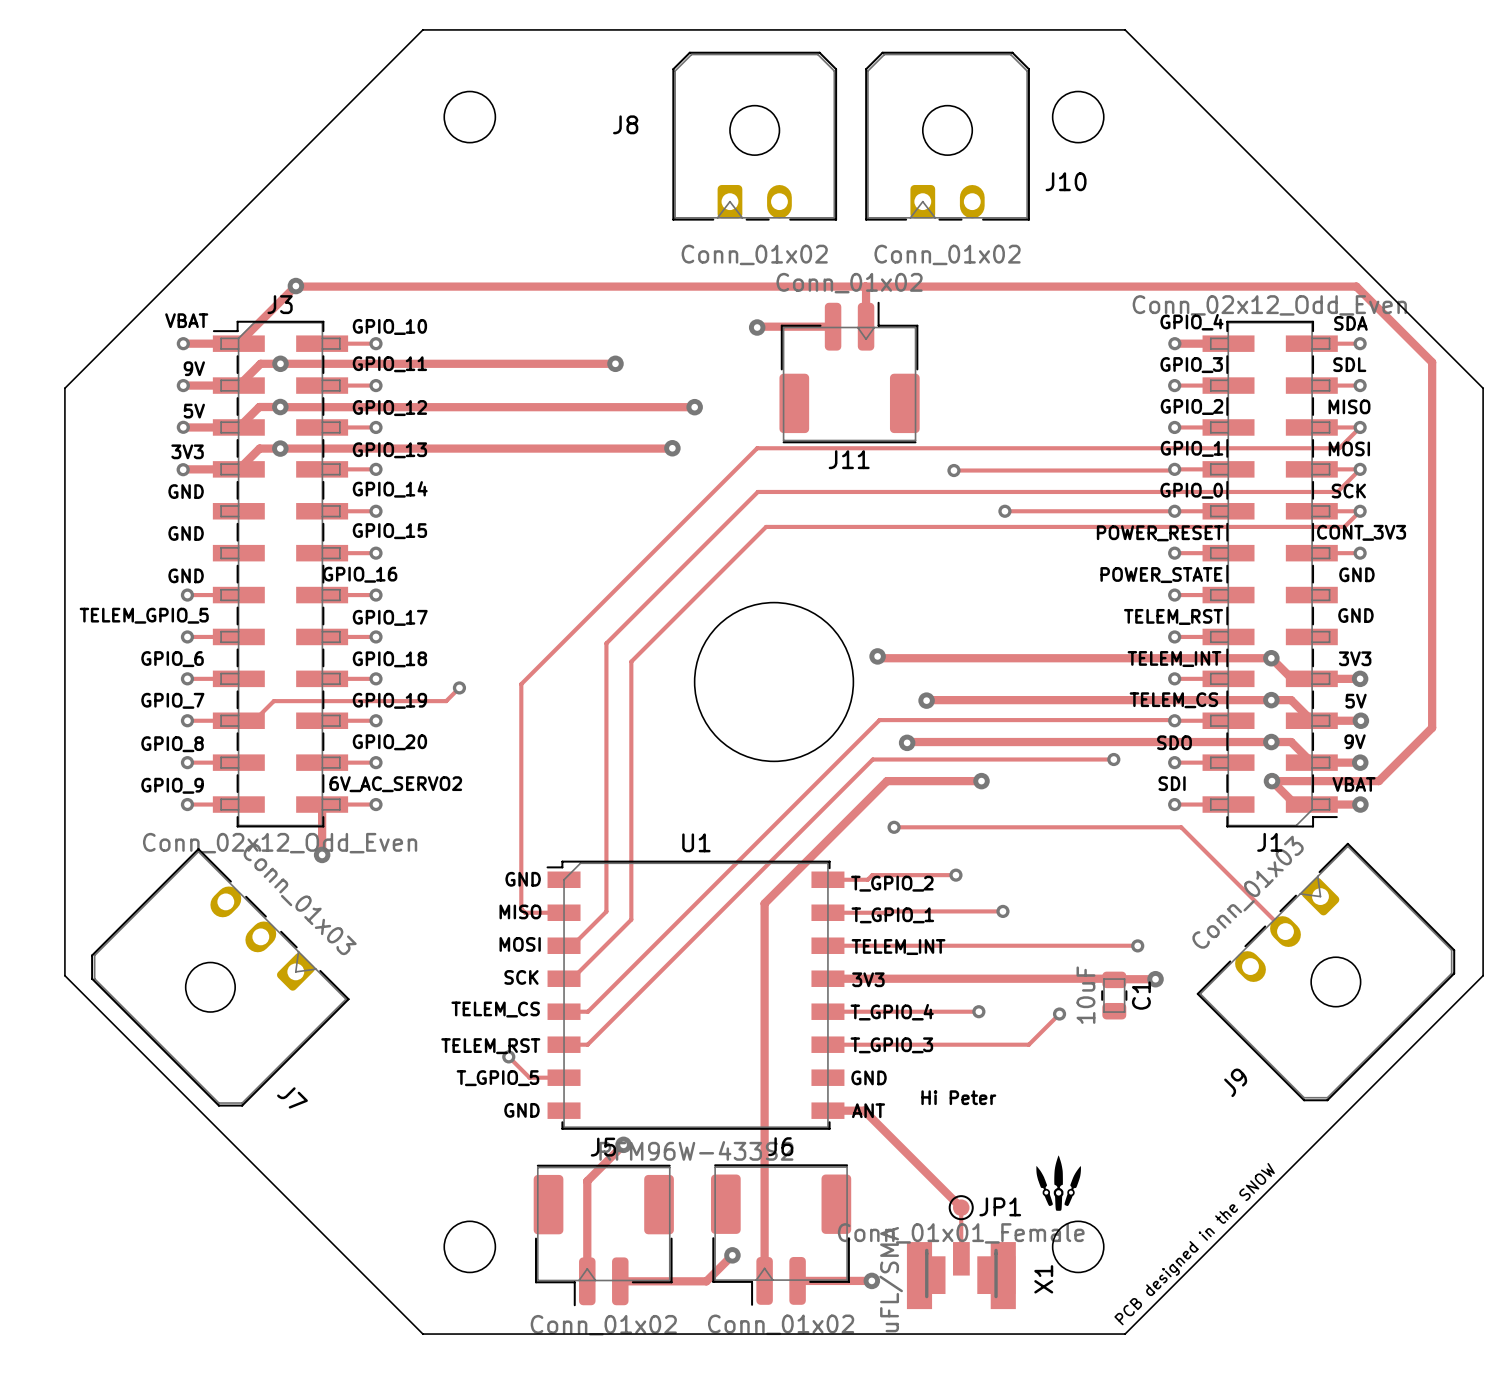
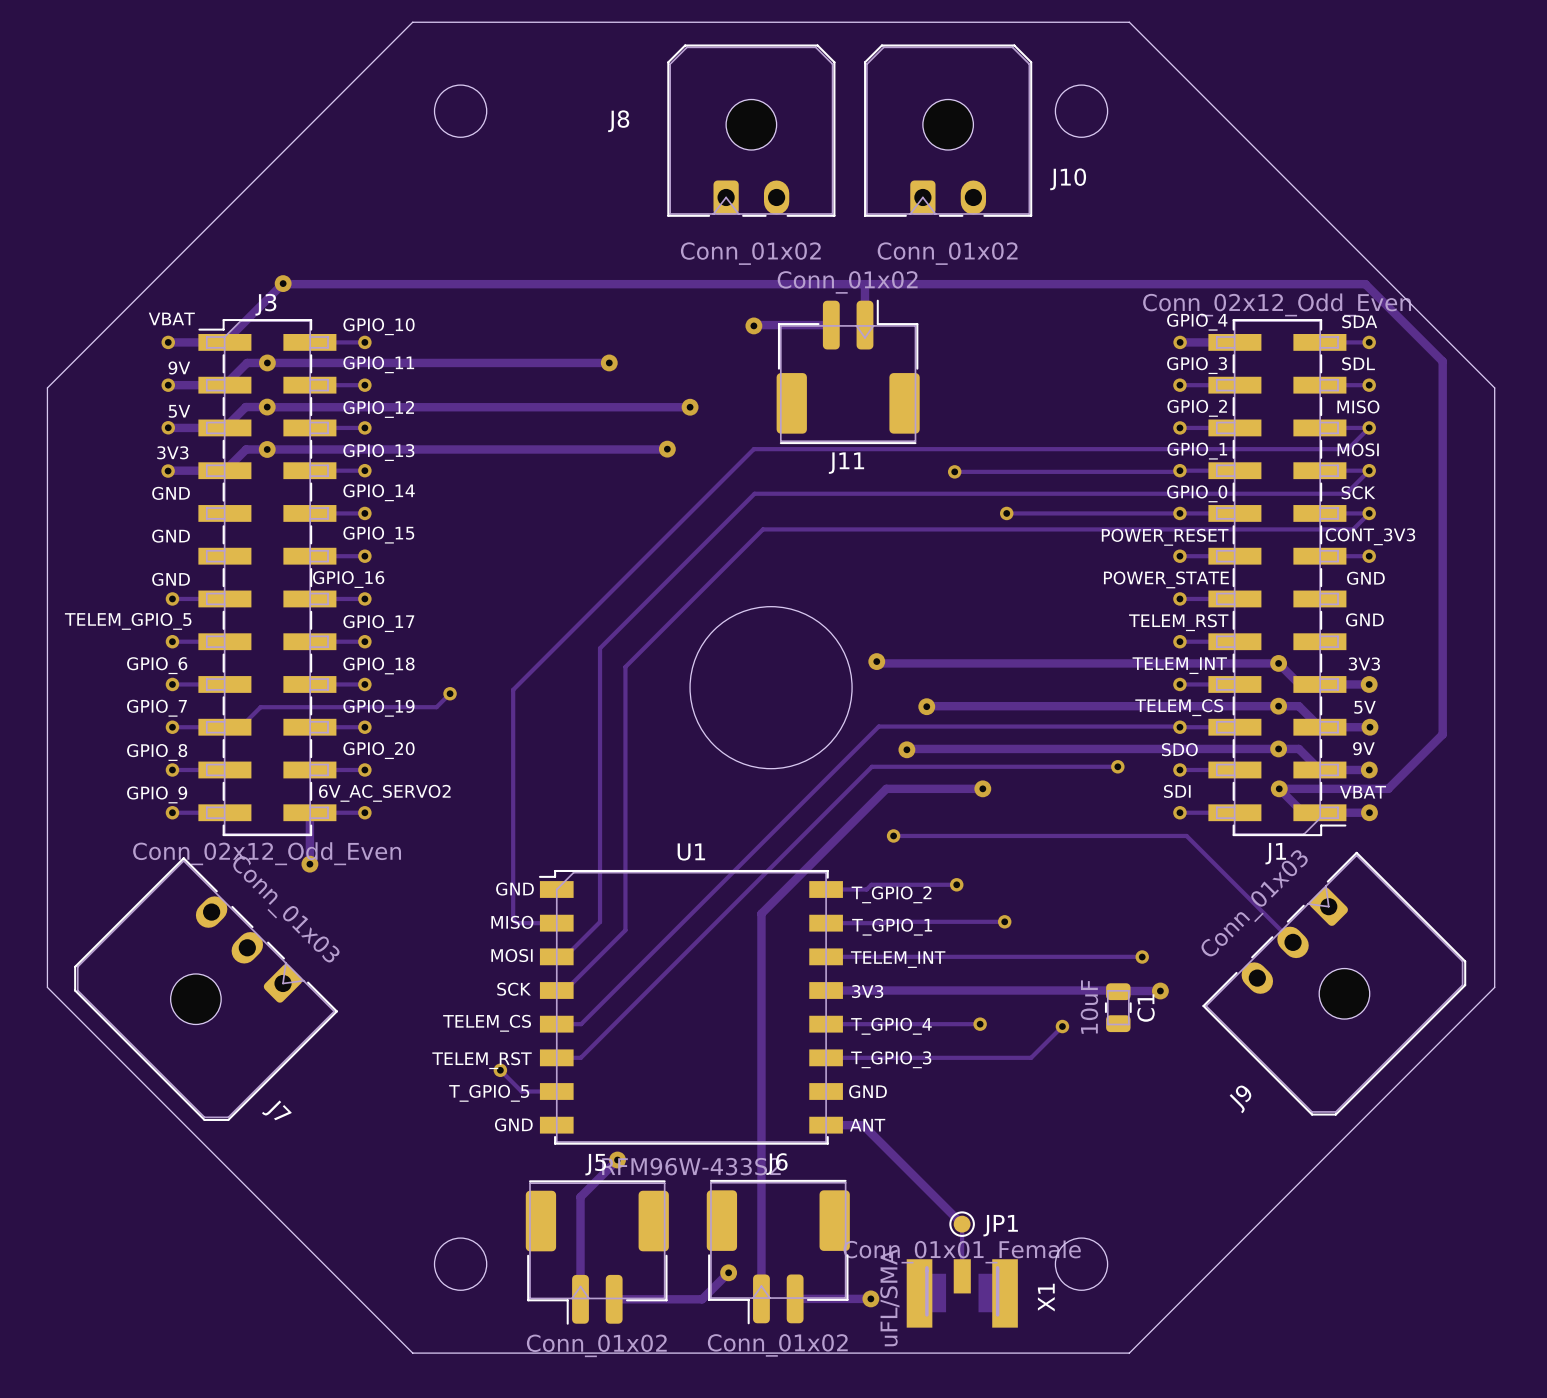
text: Hi Peter (958, 1097) -> none
drawing: [1036, 1155, 1081, 1211] -> none
text: PCB designed in the SNOW (1194, 1244) -> none

